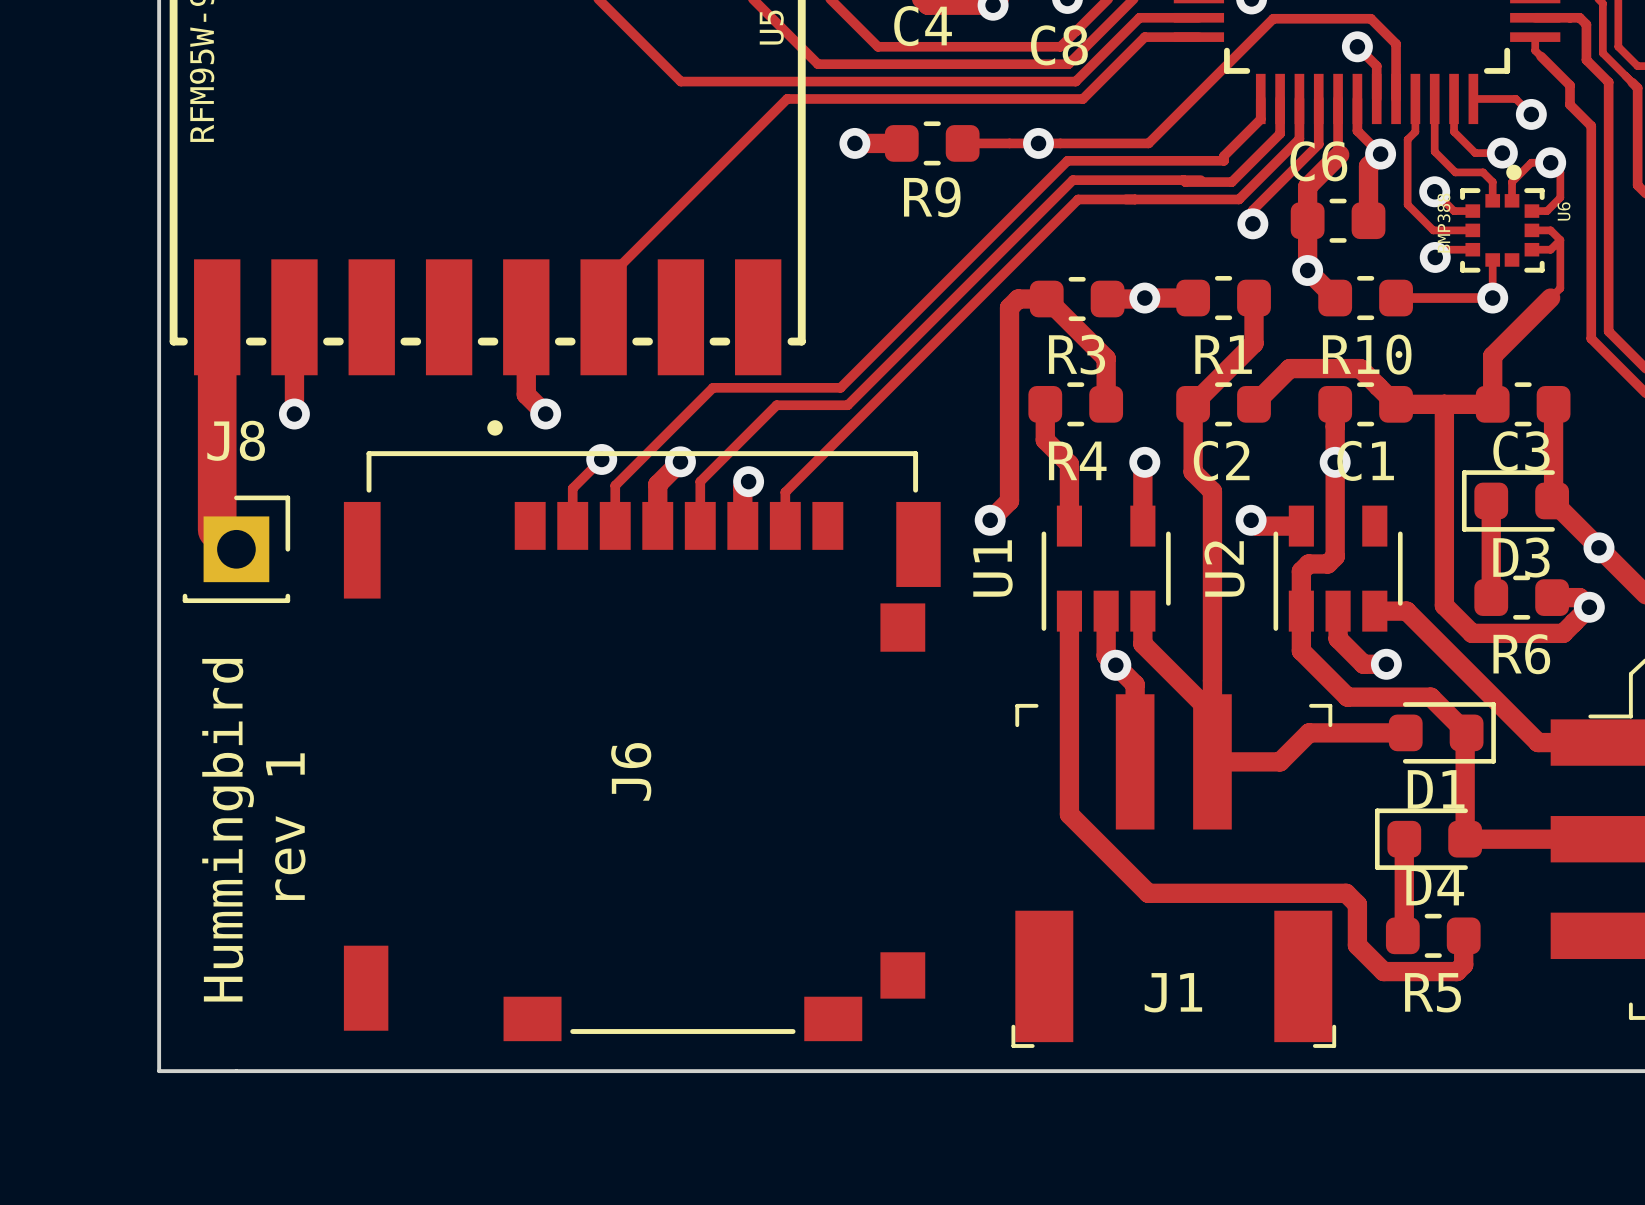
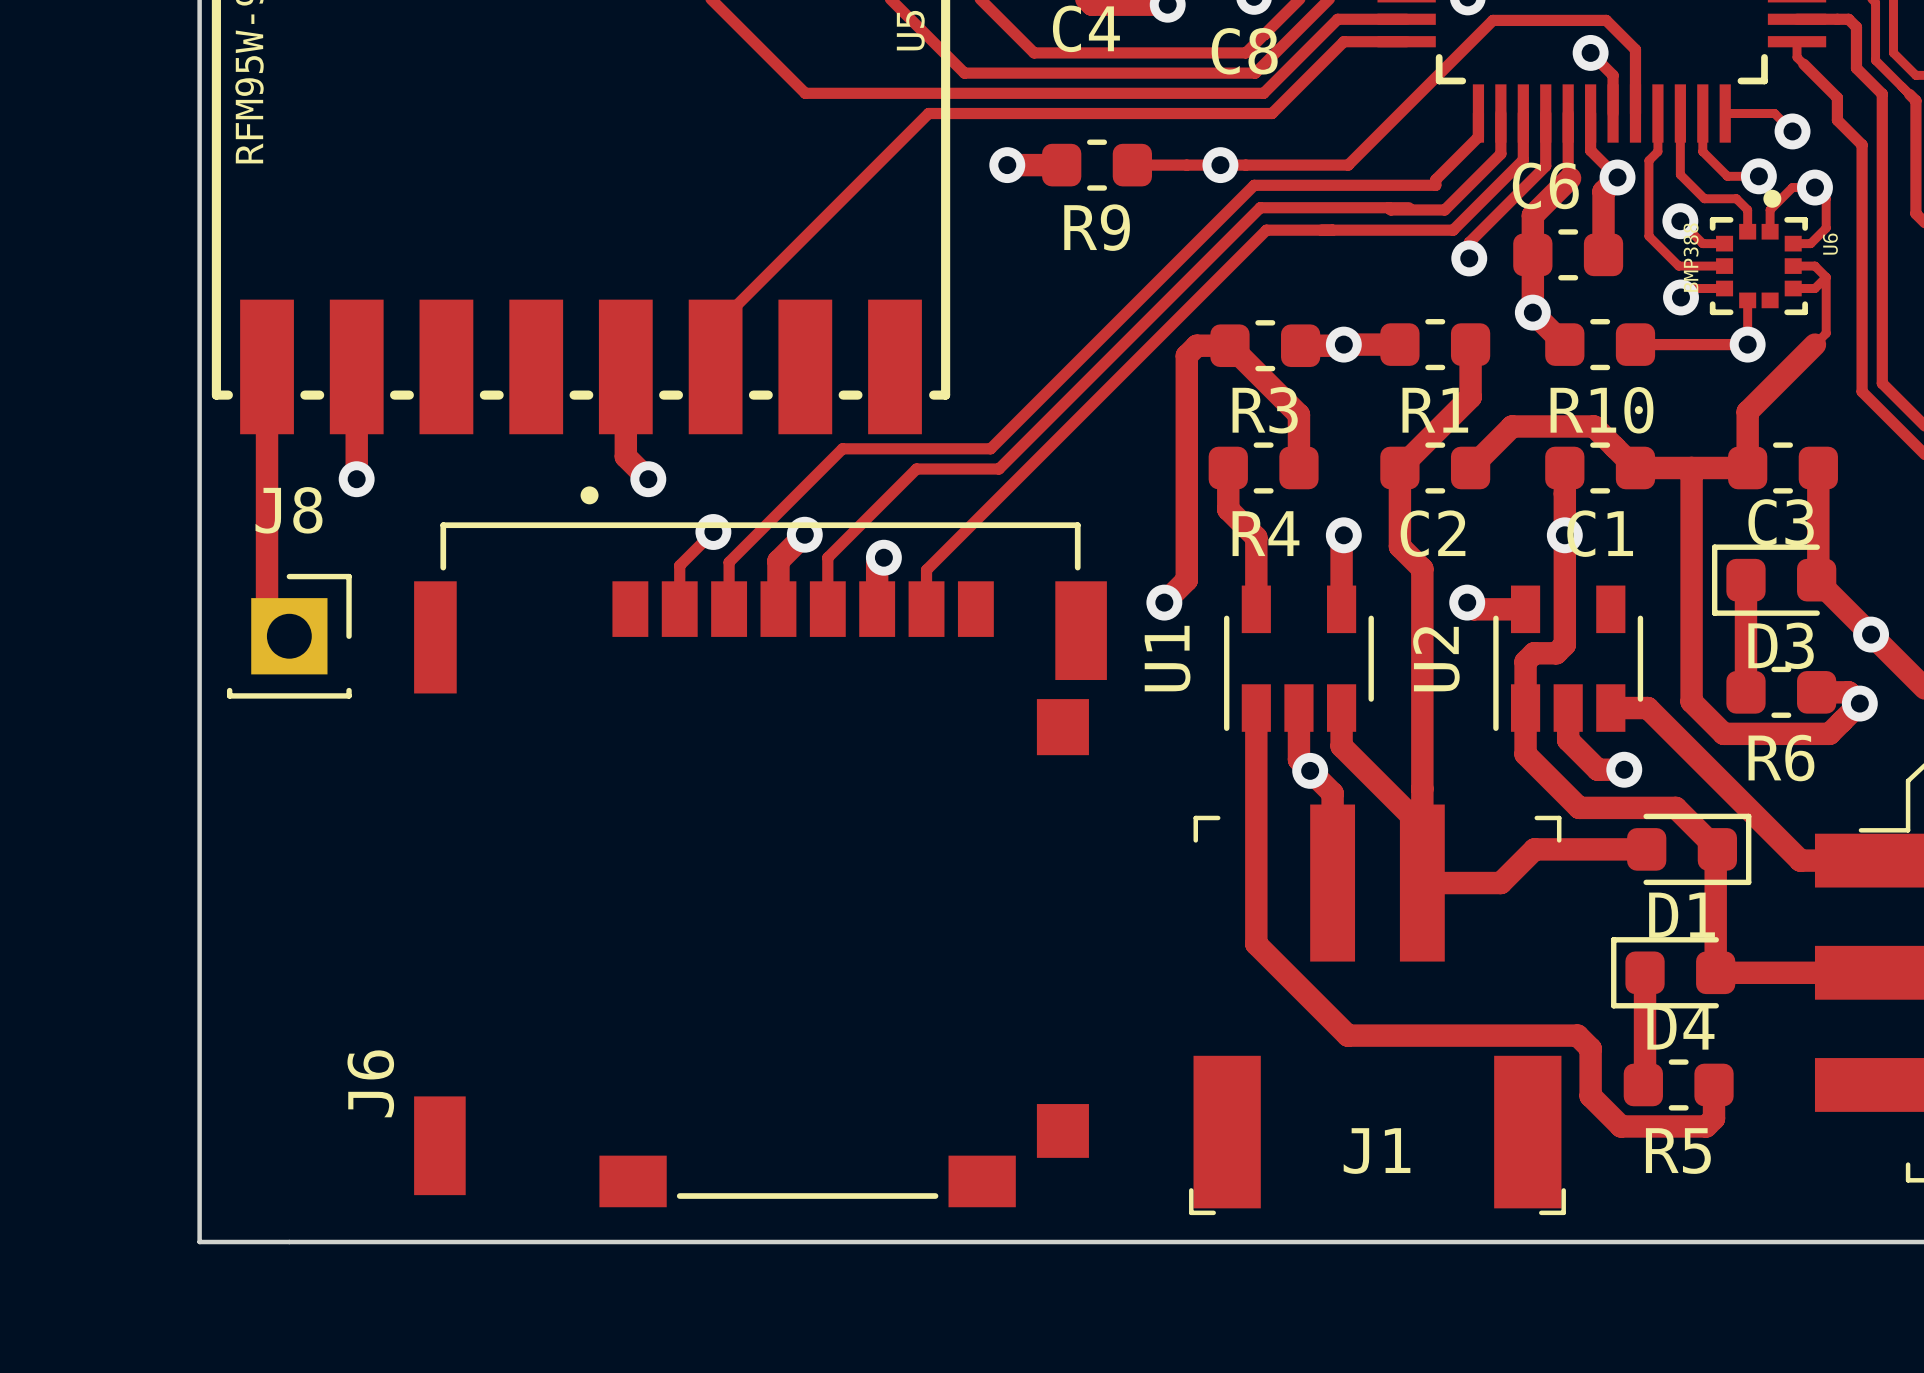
track width: thick (217, 317) (217, 530) -> thin (267, 366) (267, 613)
J6 name position: J6 (631, 771) -> J6 (370, 1083)
text: rev 1 (285, 826) -> none
text: Hummingbird (228, 830) -> none

